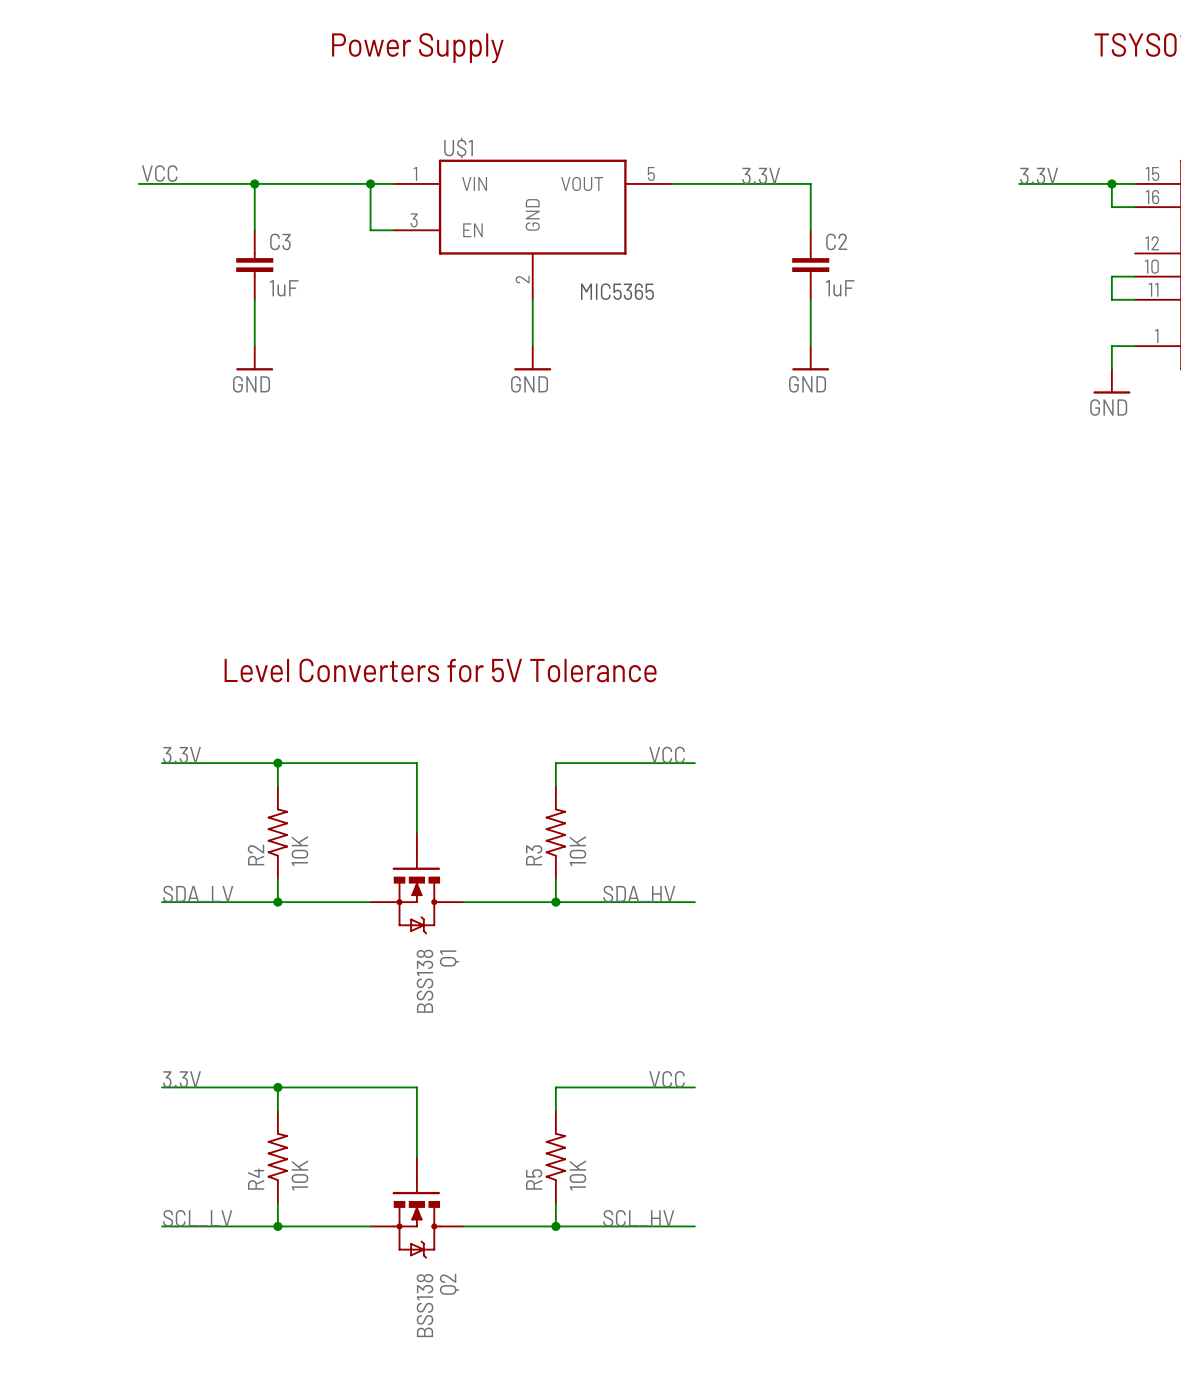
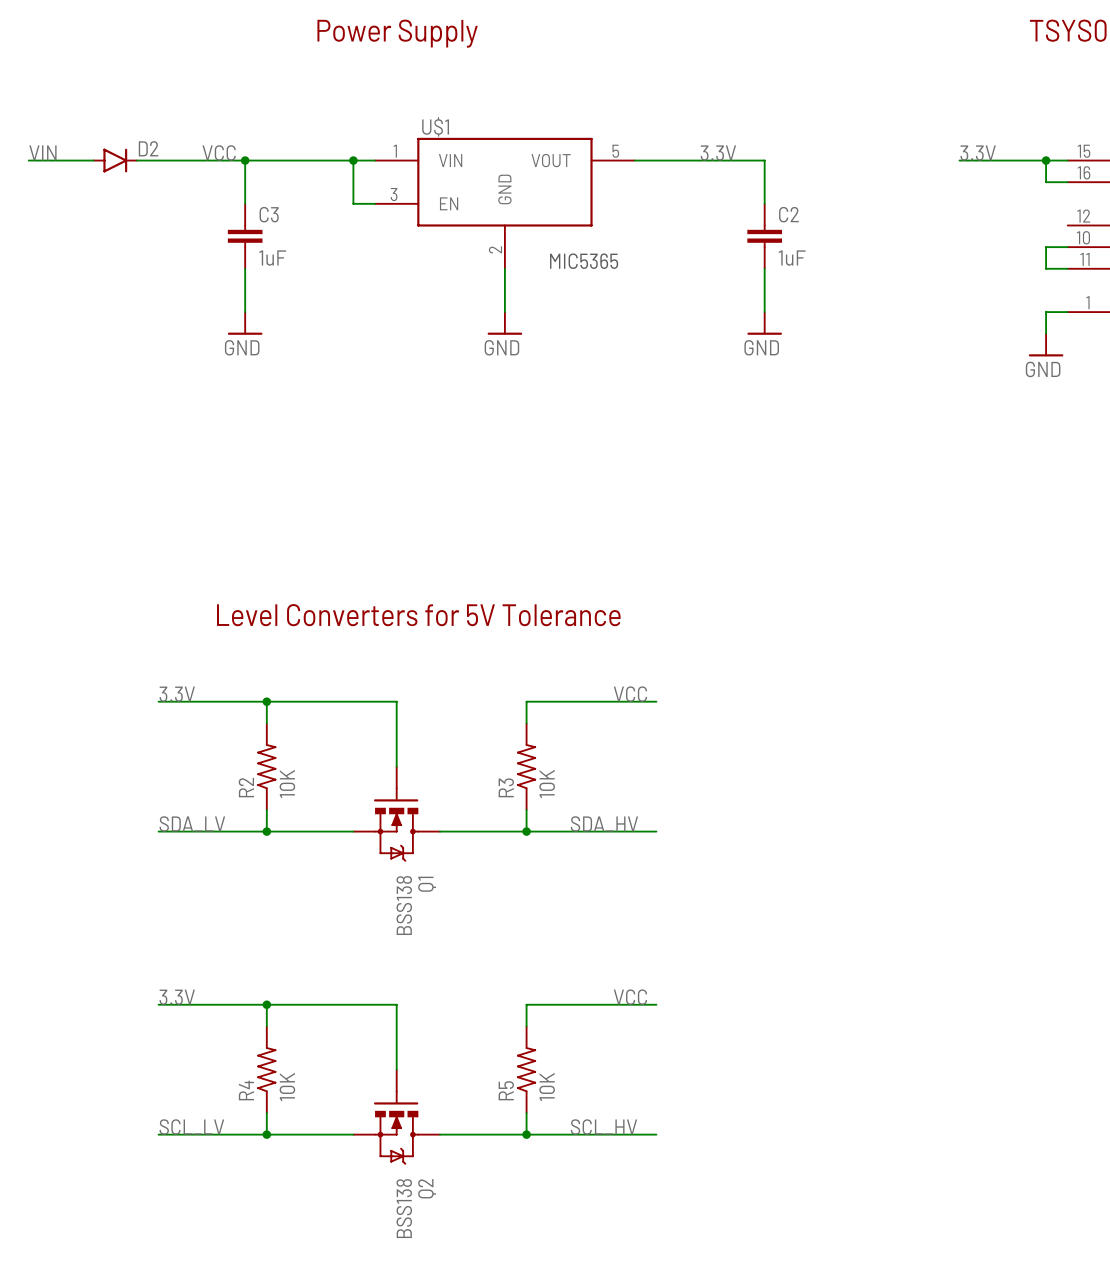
label position: VCC (159, 173) -> VCC (219, 152)
label: none -> VIN (42, 152)
wire: none -> (28, 160) (93, 160)
D2: none -> (115, 160)

